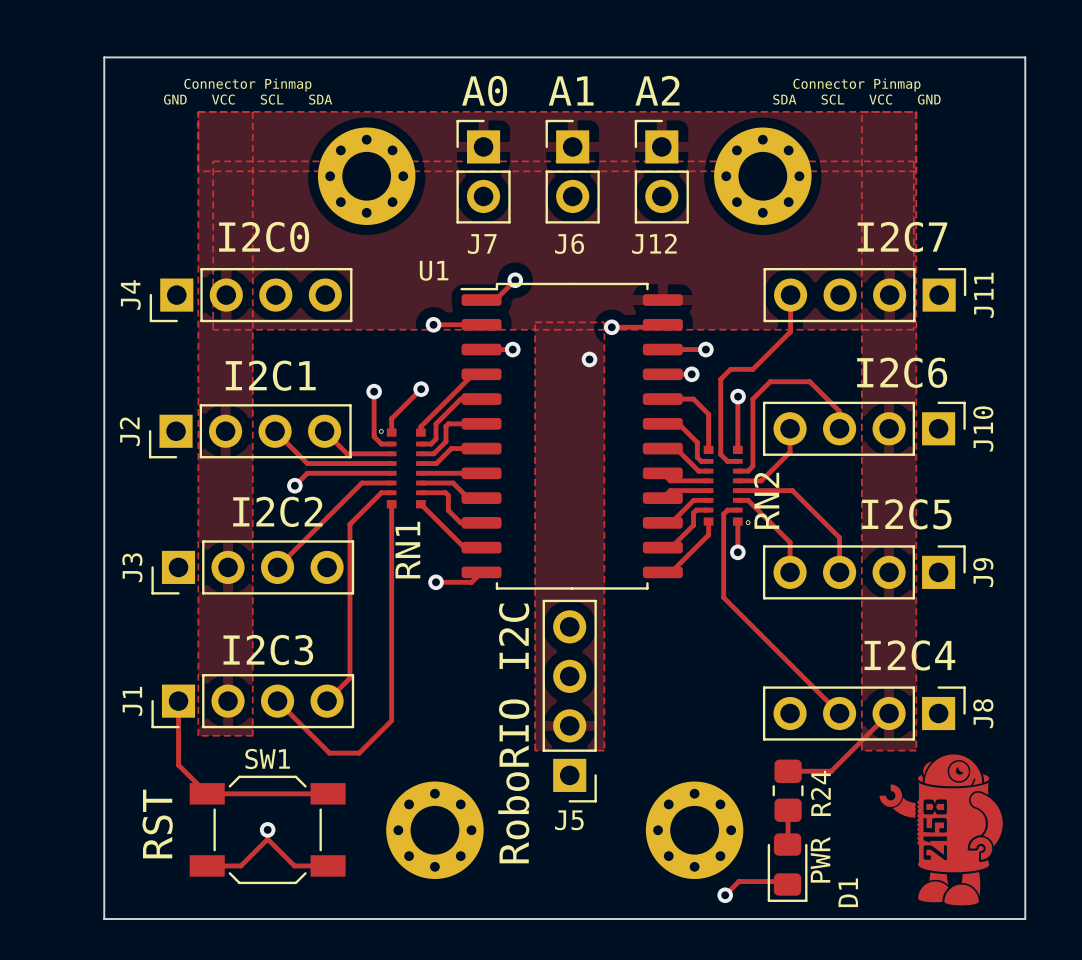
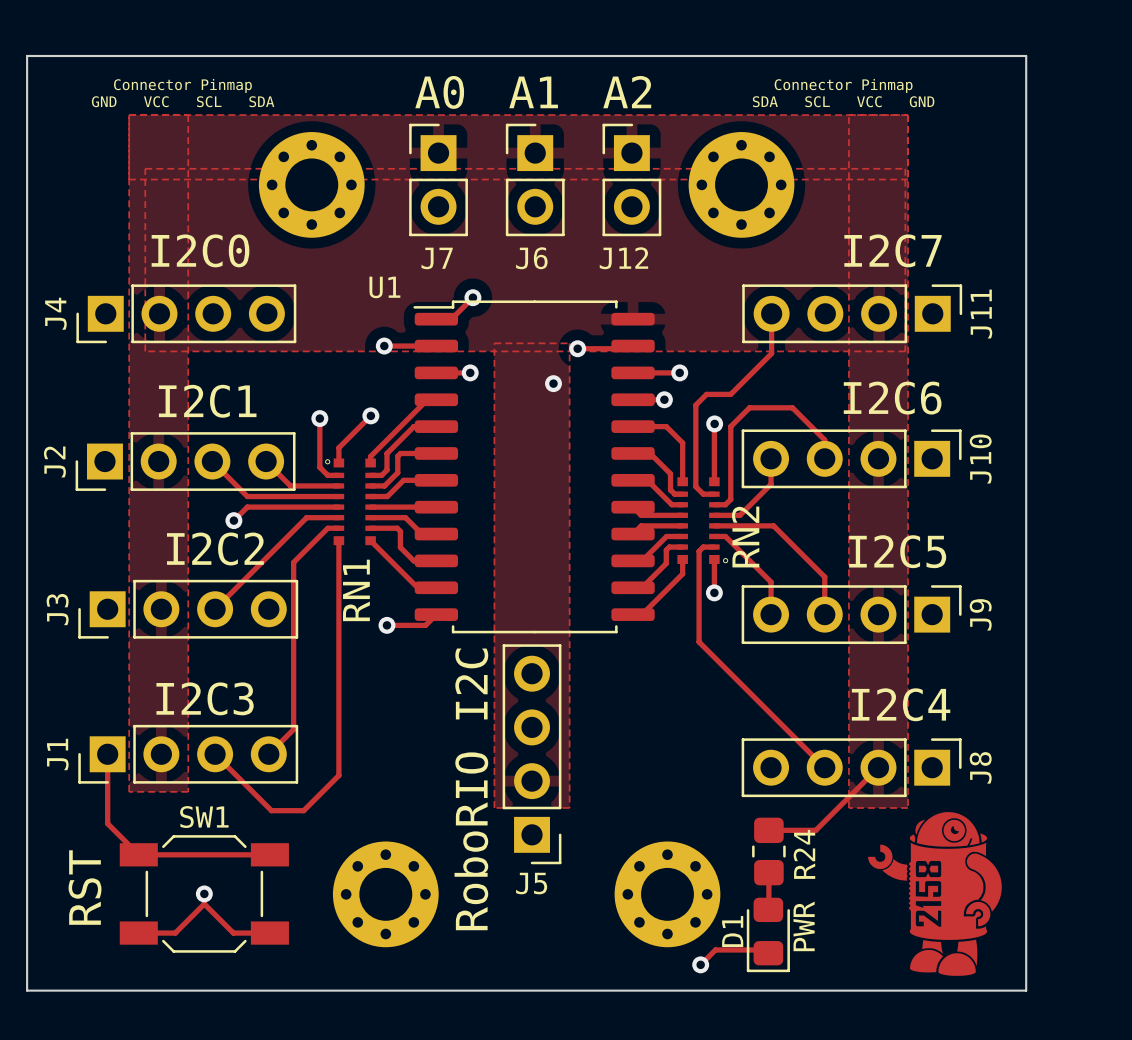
D1 name position: D1 (848, 892) -> D1 (732, 931)

